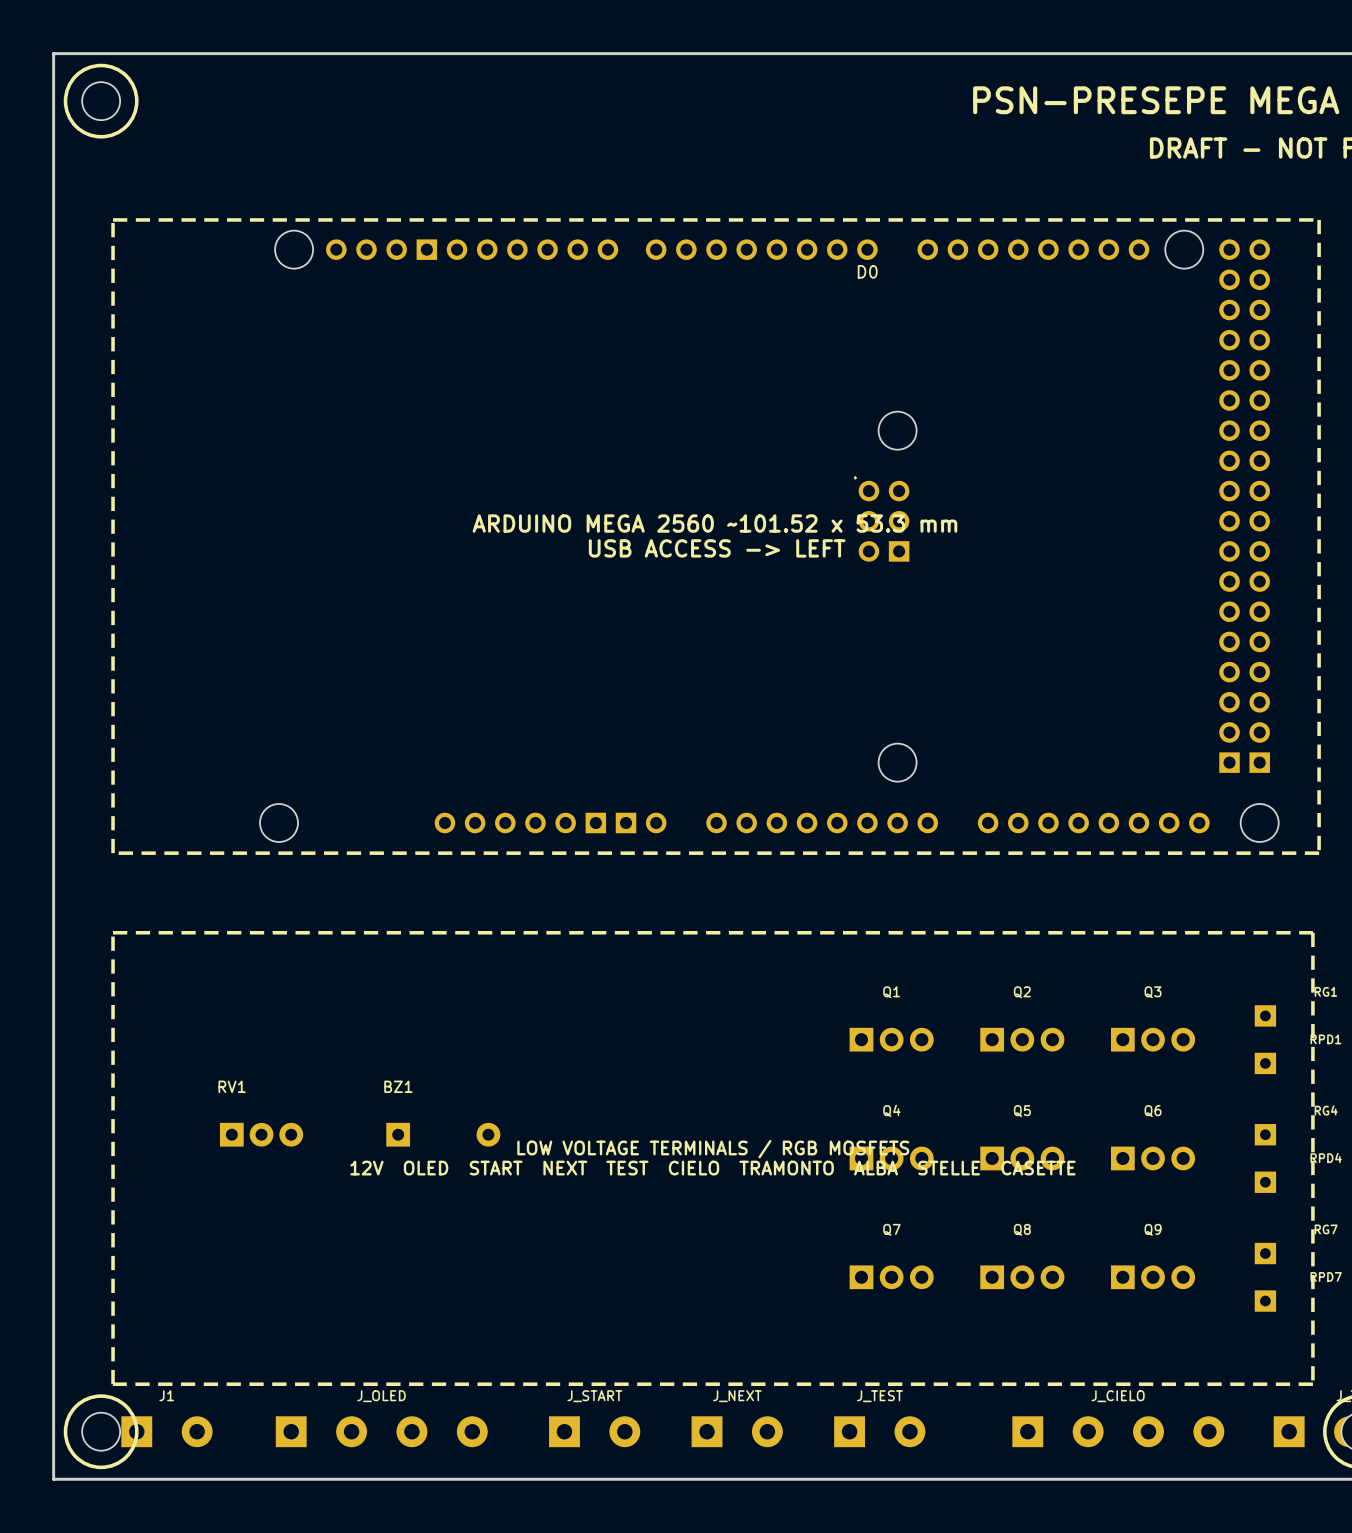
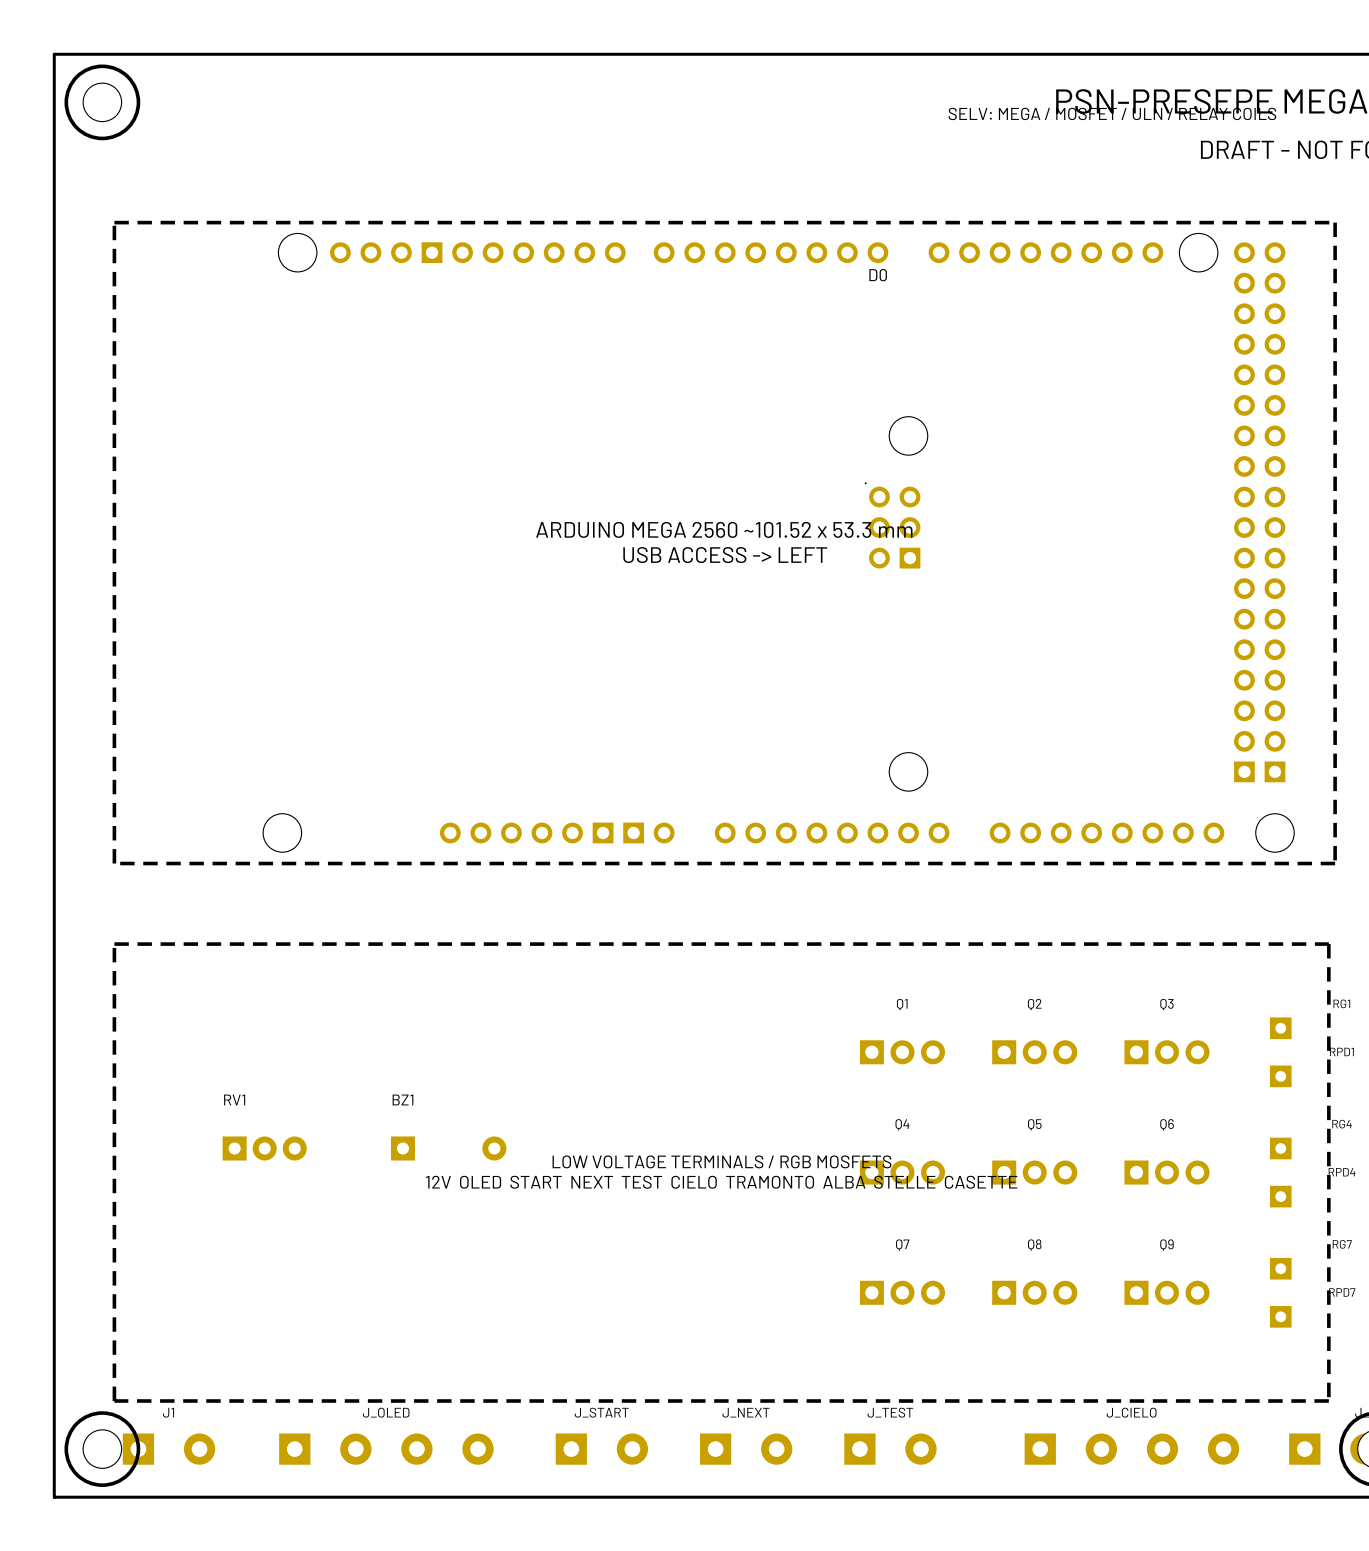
text: none -> SELV: MEGA / MOSFET / ULN / RELAY COILS (1112, 113)

